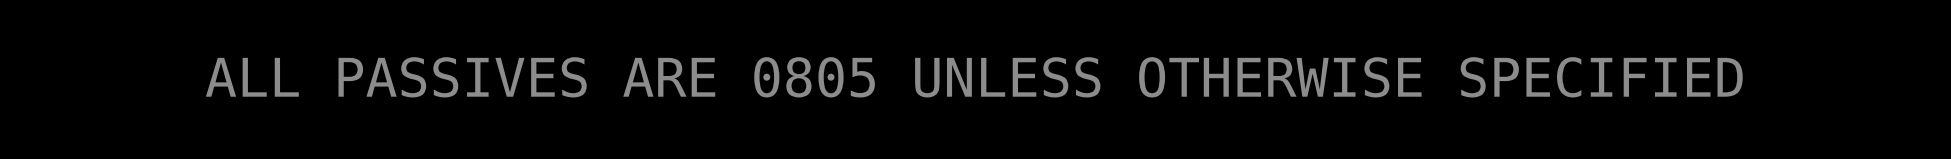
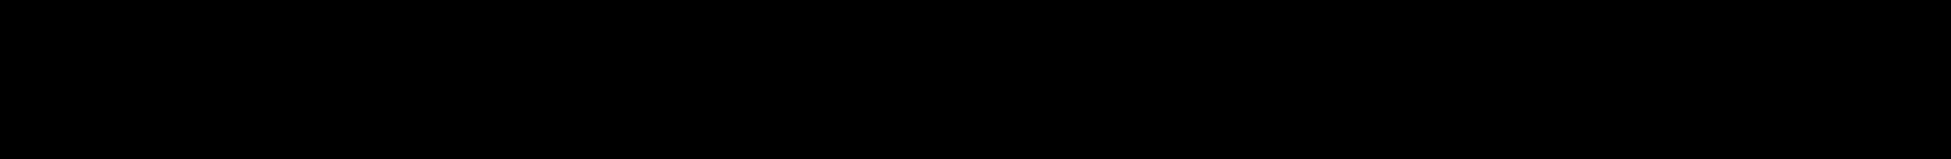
text: ALL PASSIVES ARE 0805 UNLESS OTHERWISE SPECIFIED (974, 77) -> none

